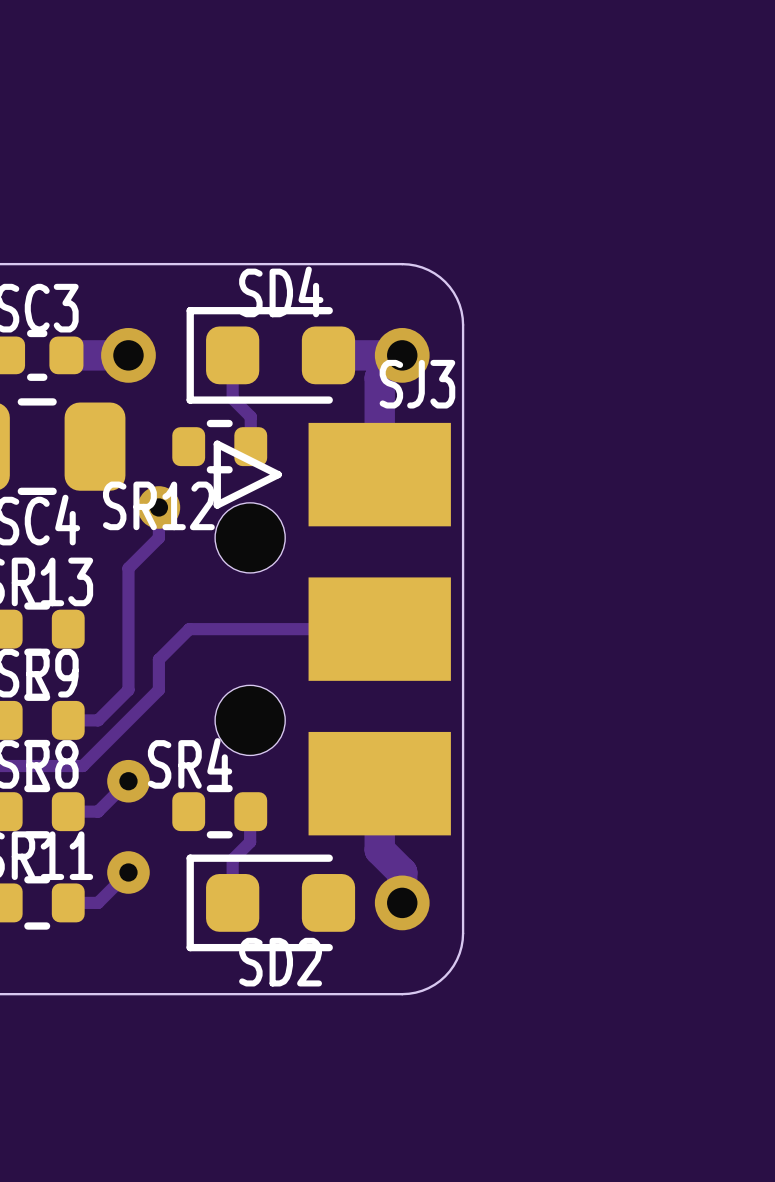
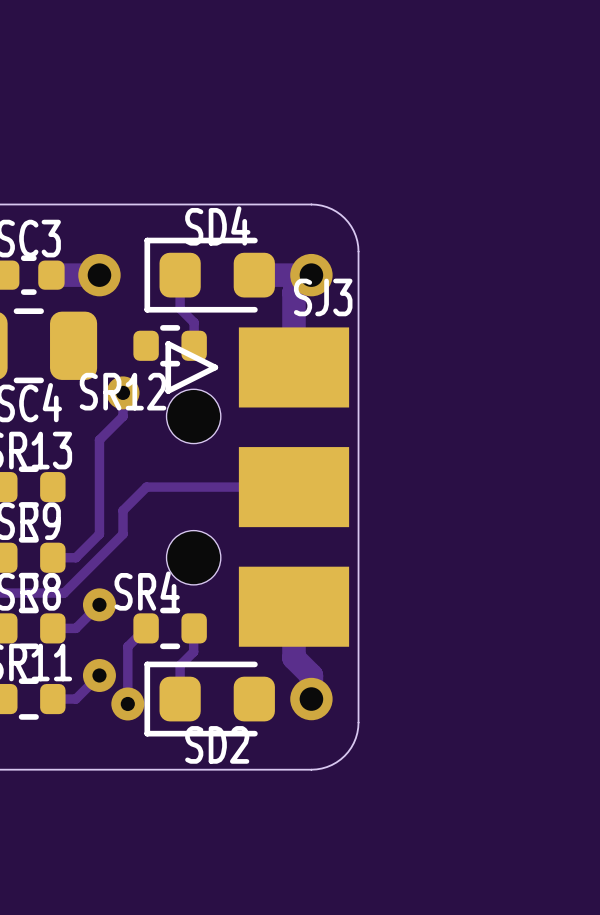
track: none -> (146, 628) (127, 646) (127, 703)
via: none -> (127, 703)

